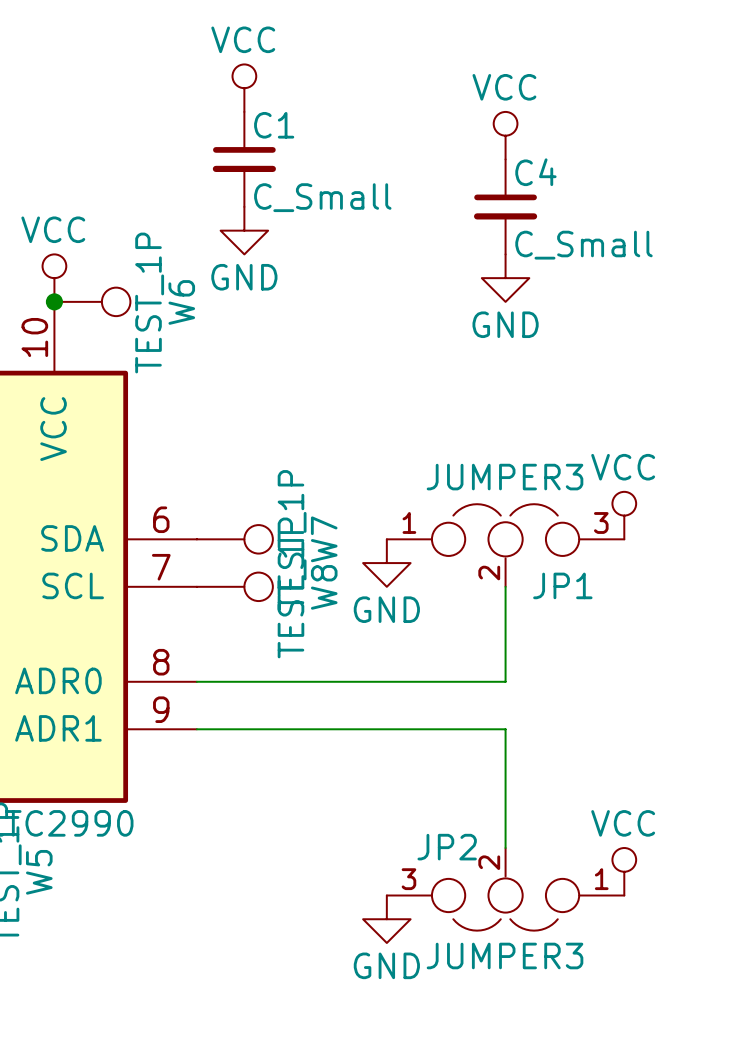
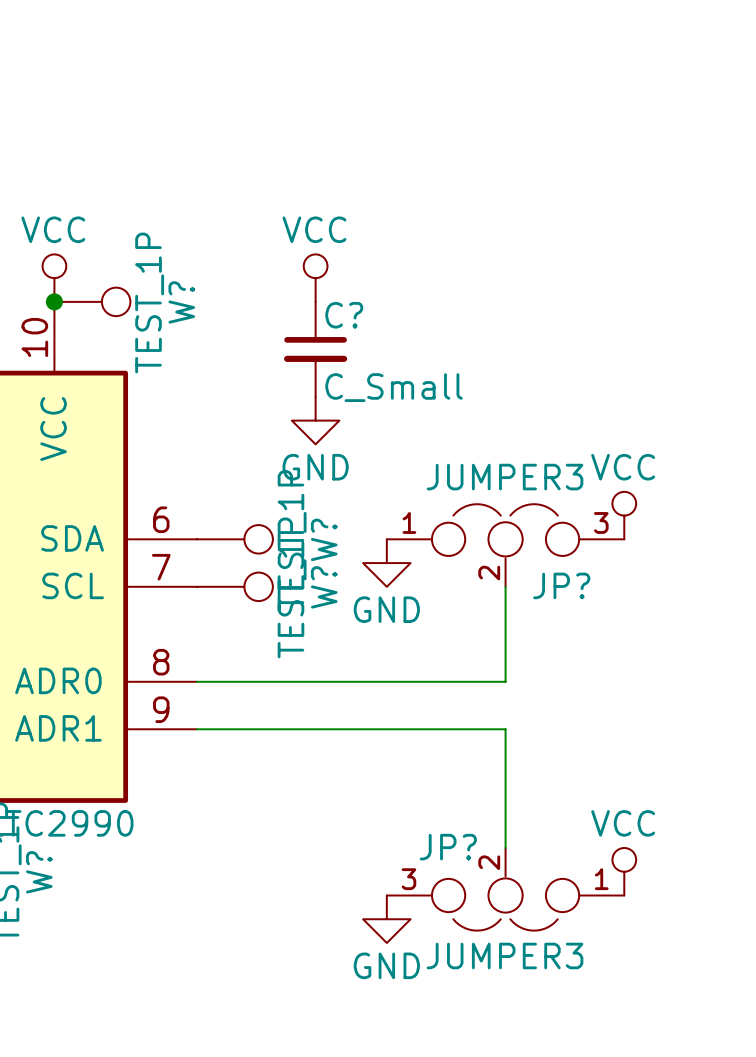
power symbol: VCC (244, 88) -> none
power symbol: VCC (505, 135) -> none
C1: C_Small (244, 159) -> none
C4: C_Small (505, 206) -> none
power symbol: GND (244, 230) -> none
power symbol: none -> VCC (315, 278)
power symbol: GND (505, 278) -> none
W6 name: W6 (181, 302) -> W? (181, 302)
C?: none -> C_Small (315, 349)
power symbol: none -> GND (315, 420)
W7 name: W7 (324, 539) -> W? (324, 539)
JP1 name: JP1 (562, 585) -> JP? (561, 585)
W8 name: W8 (324, 587) -> W? (324, 587)
JP2 name: JP2 (447, 847) -> JP? (448, 847)
W5 name: W5 (39, 872) -> W? (39, 872)

